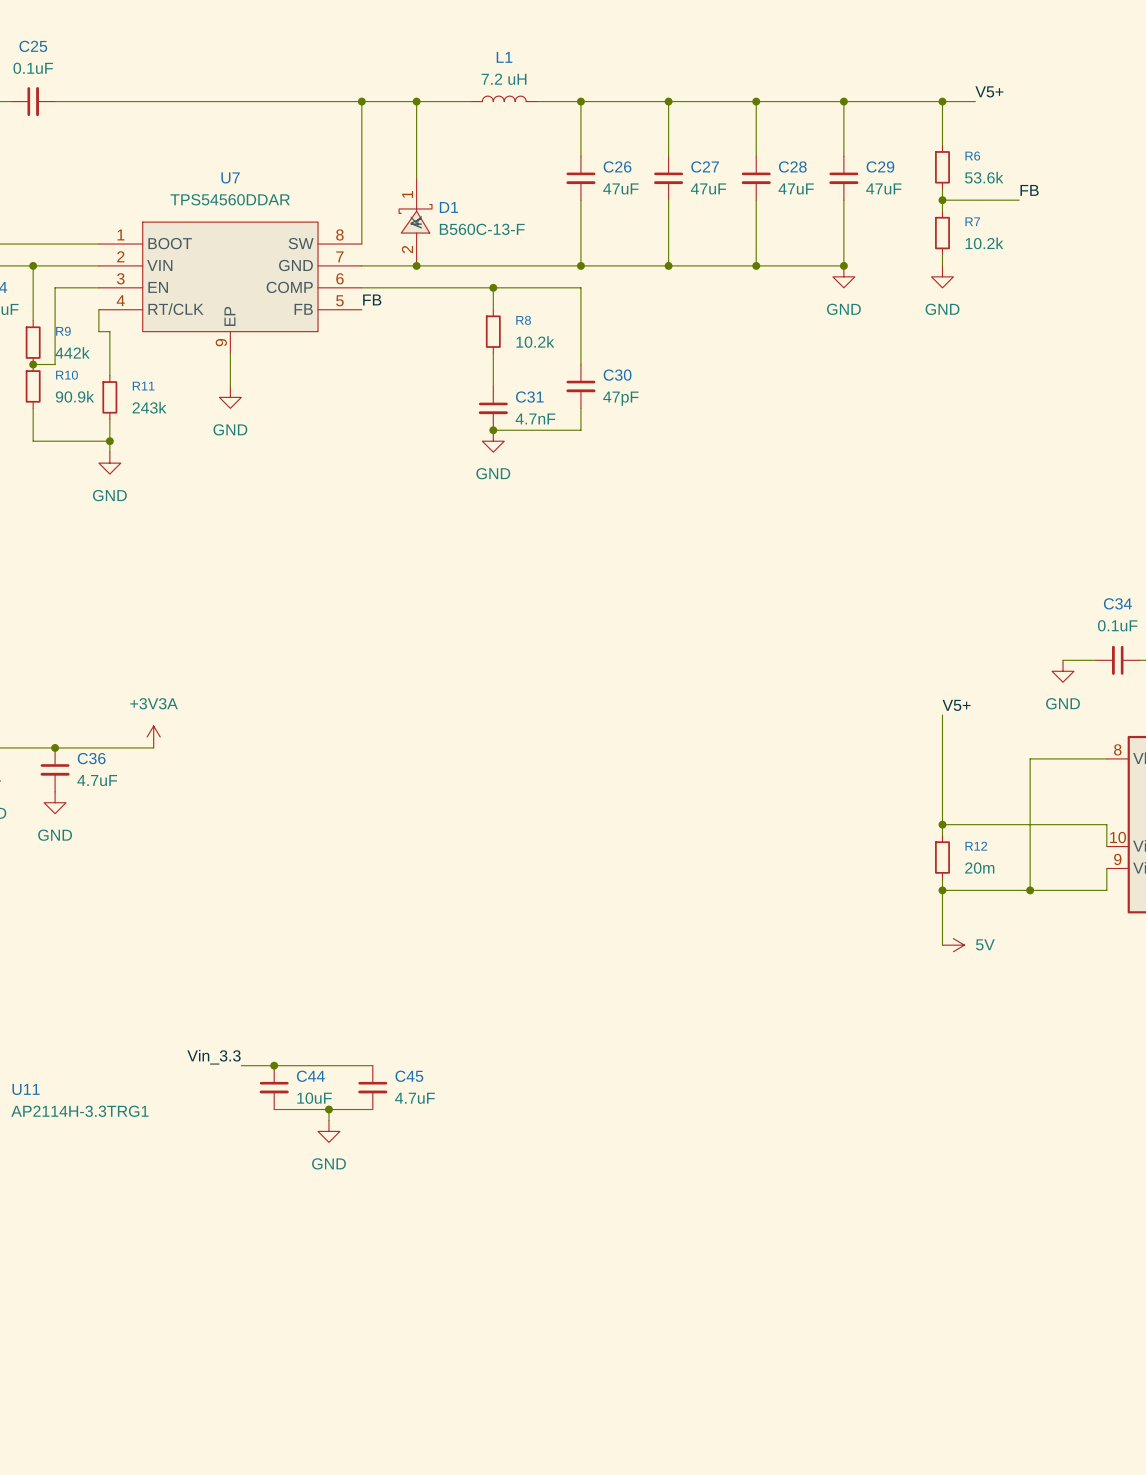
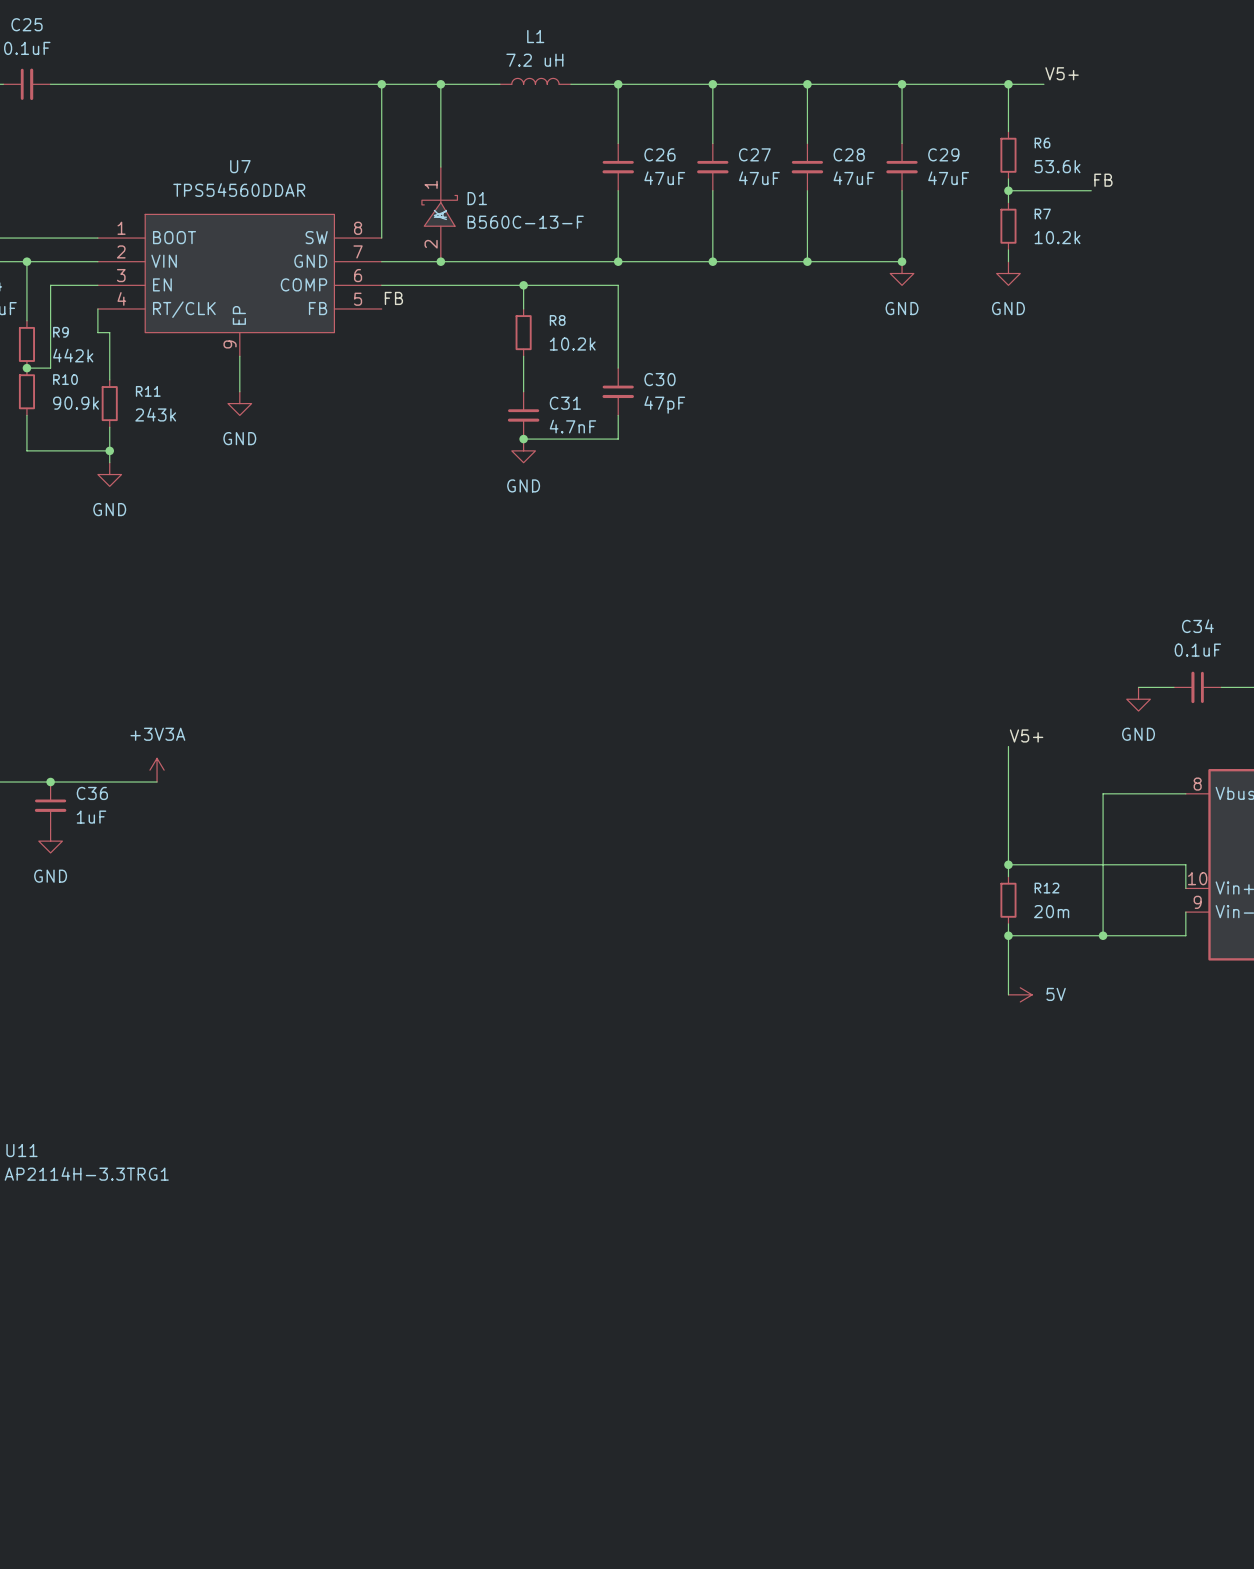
C36 value: 4.7uF (97, 780) -> 1uF (91, 817)
label: Vin_3.3 (214, 1057) -> none
wire: (241, 1065) (372, 1065) -> none
junction: (274, 1065) -> none
C44: 10uF (274, 1087) -> none
C45: 4.7uF (372, 1087) -> none
wire: (274, 1109) (372, 1109) -> none
wire: (328, 1109) (328, 1120) -> none
junction: (328, 1109) -> none
power symbol: GND (328, 1131) -> none

